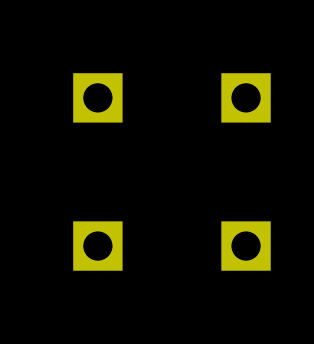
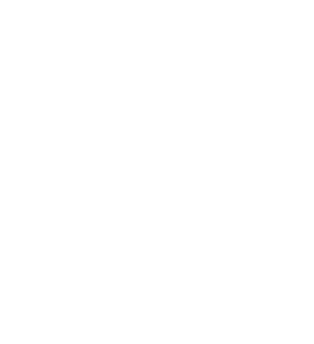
part: (97, 97) -> none
part: (246, 97) -> none
part: (97, 246) -> none
part: (246, 246) -> none

